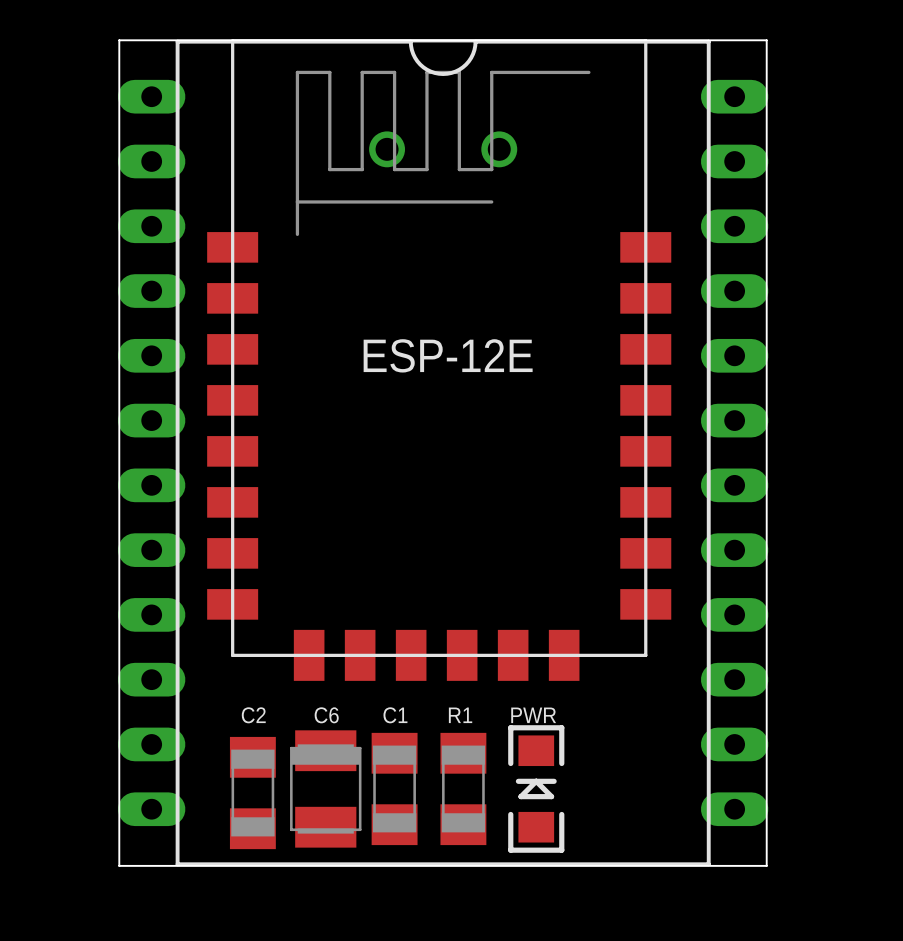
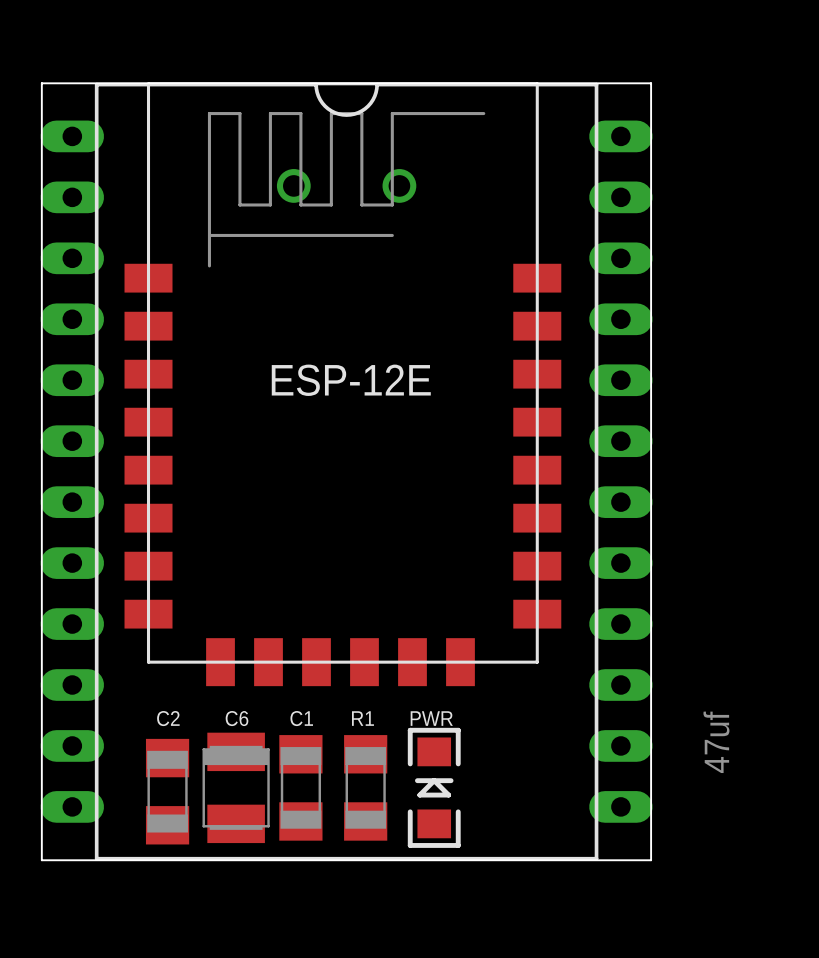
C6 value: none -> 47uf (716, 742)

